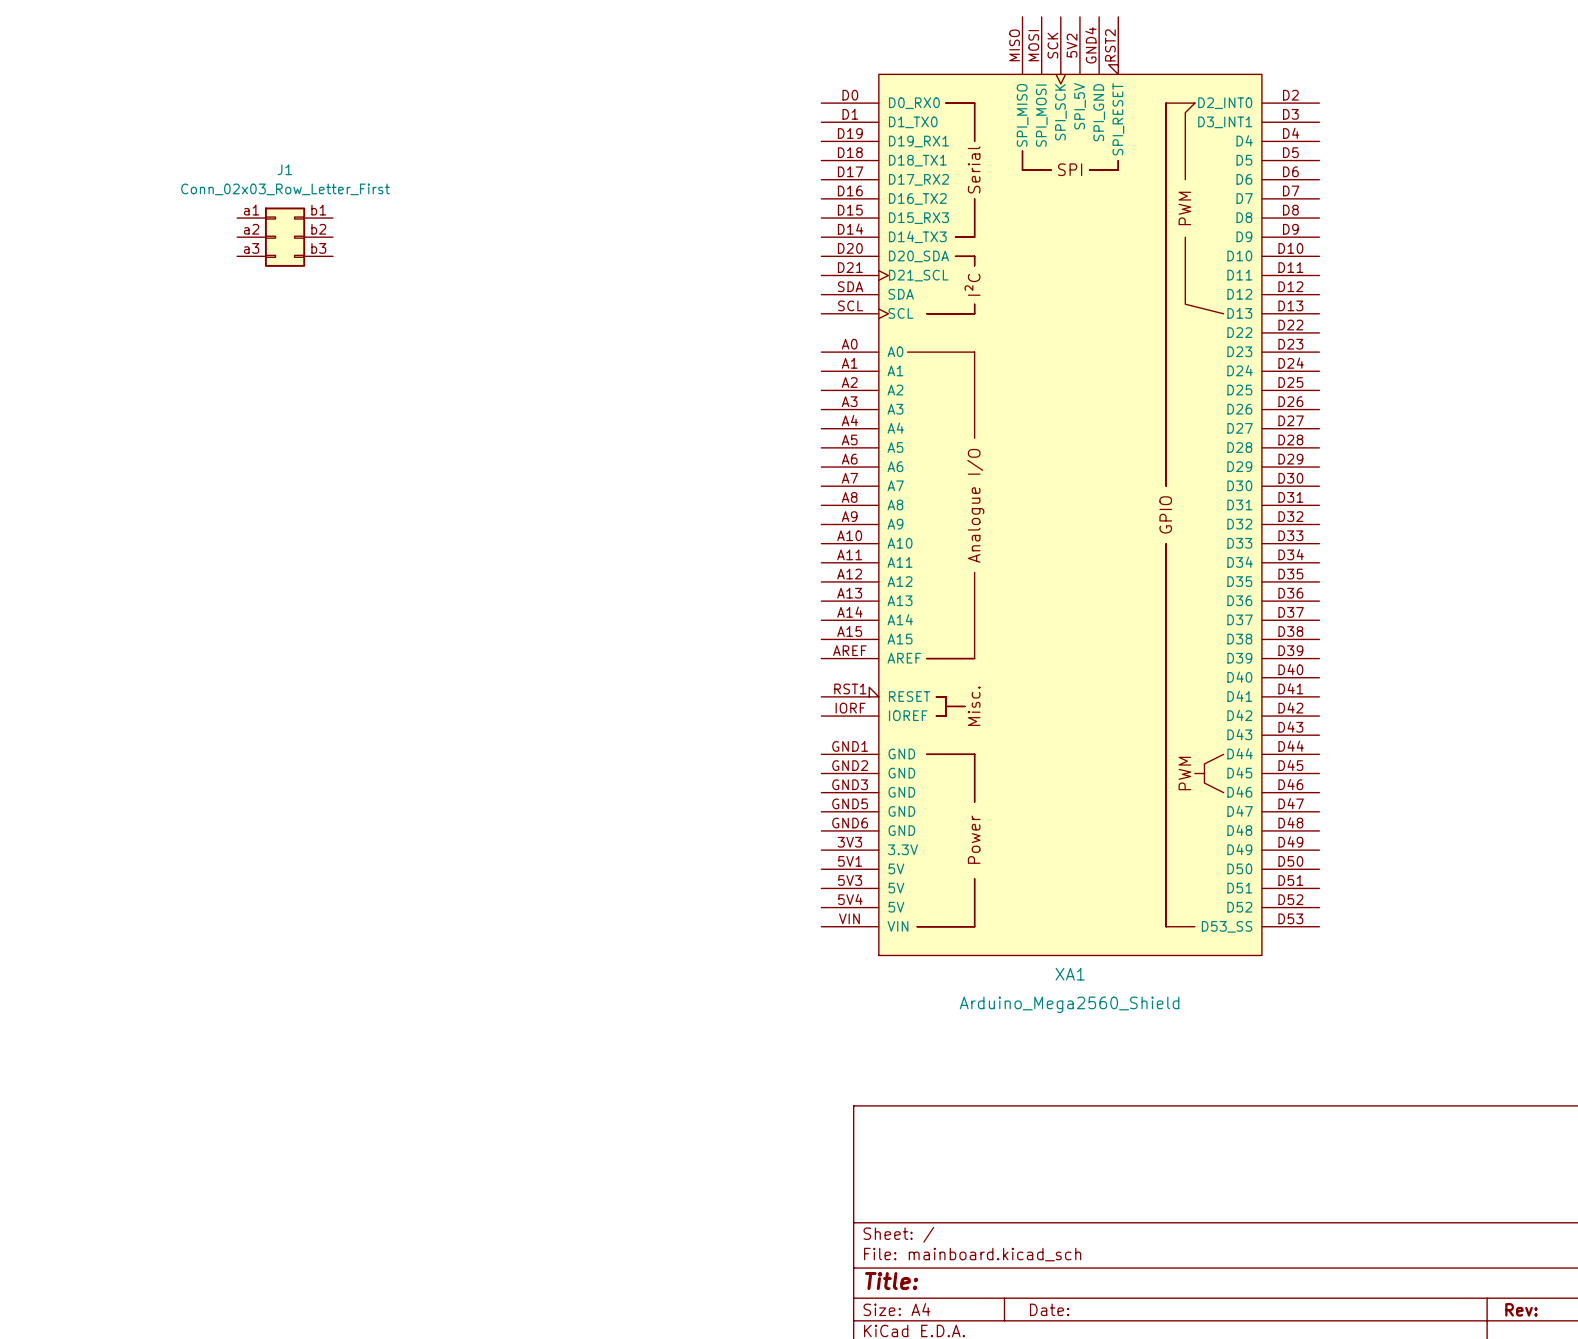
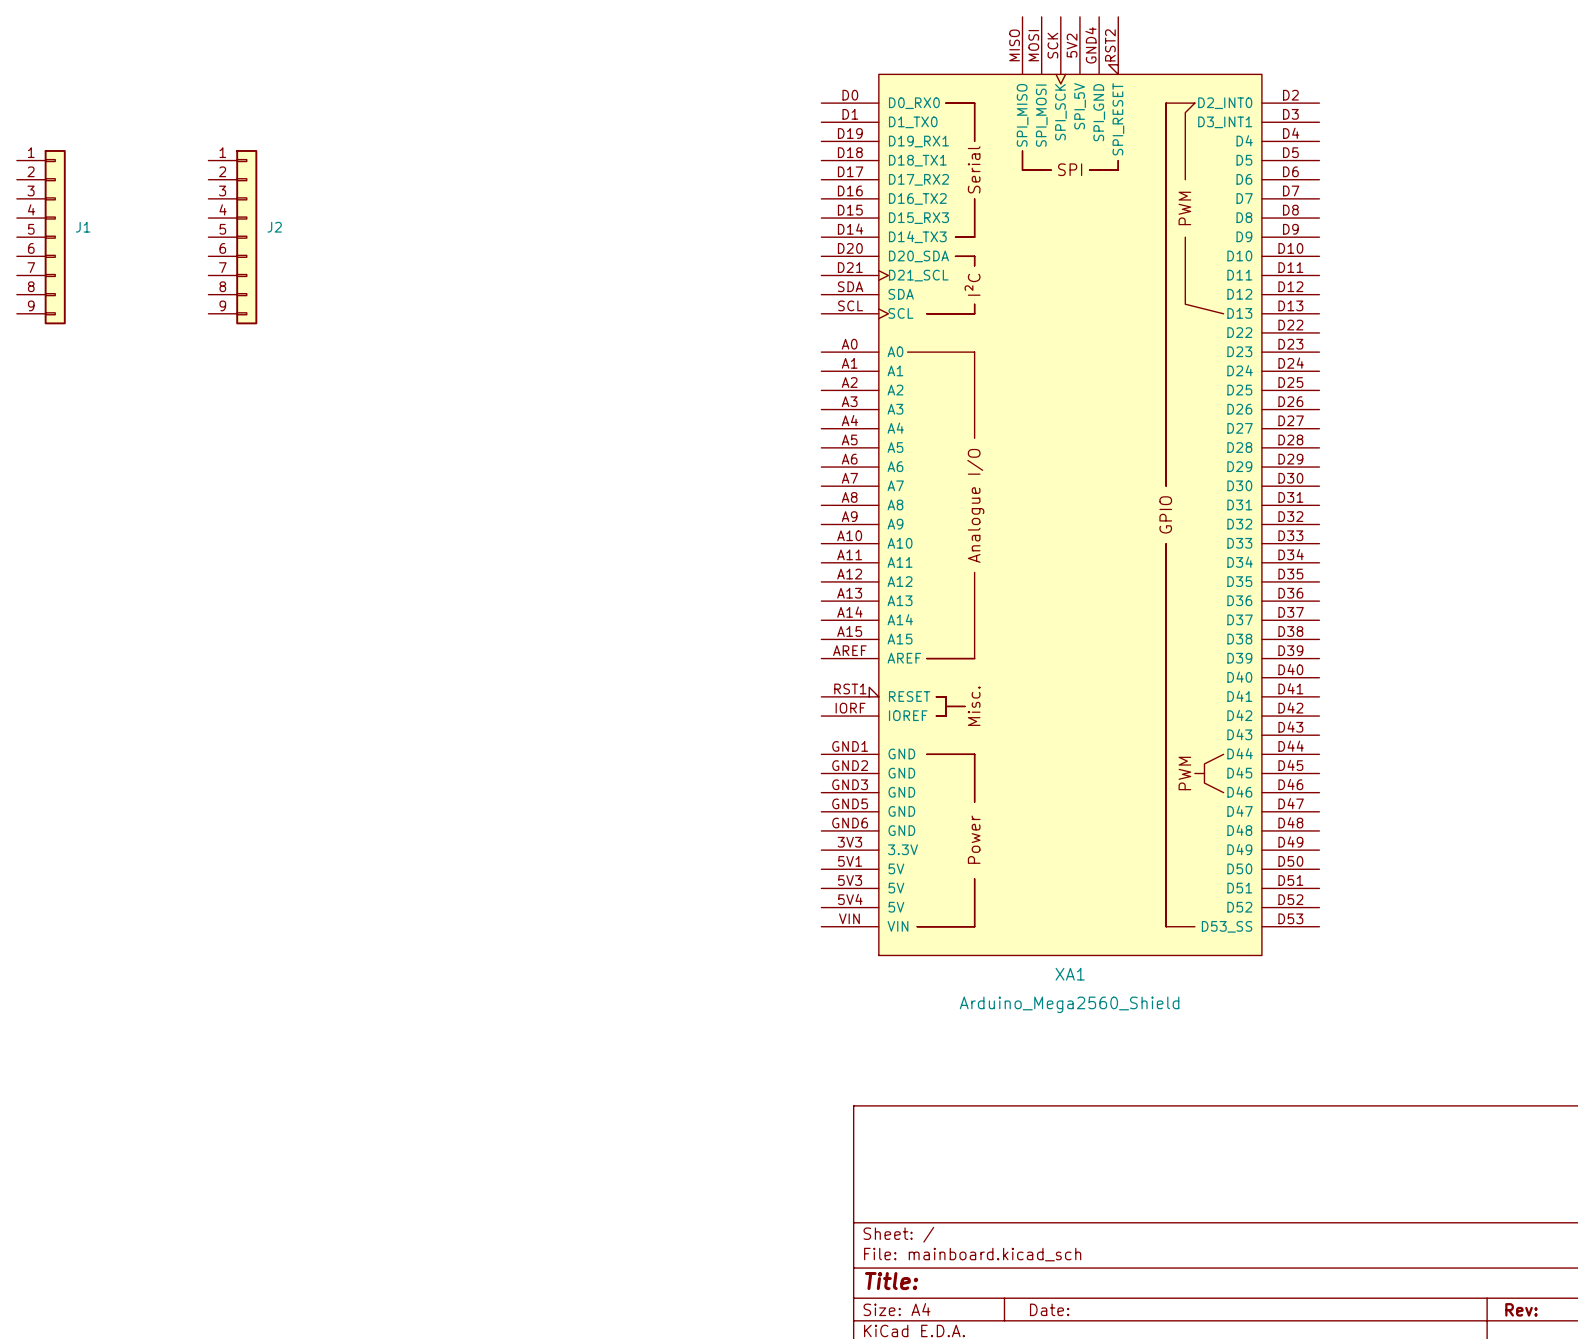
J1 name position: J1 (284, 169) -> J1 (83, 227)
J1 value: Conn_02x03_Row_Letter_First (285, 189) -> none
J1 symbol: [237, 207, 333, 267] -> [16, 150, 66, 325]
J2: none -> (232, 237)

